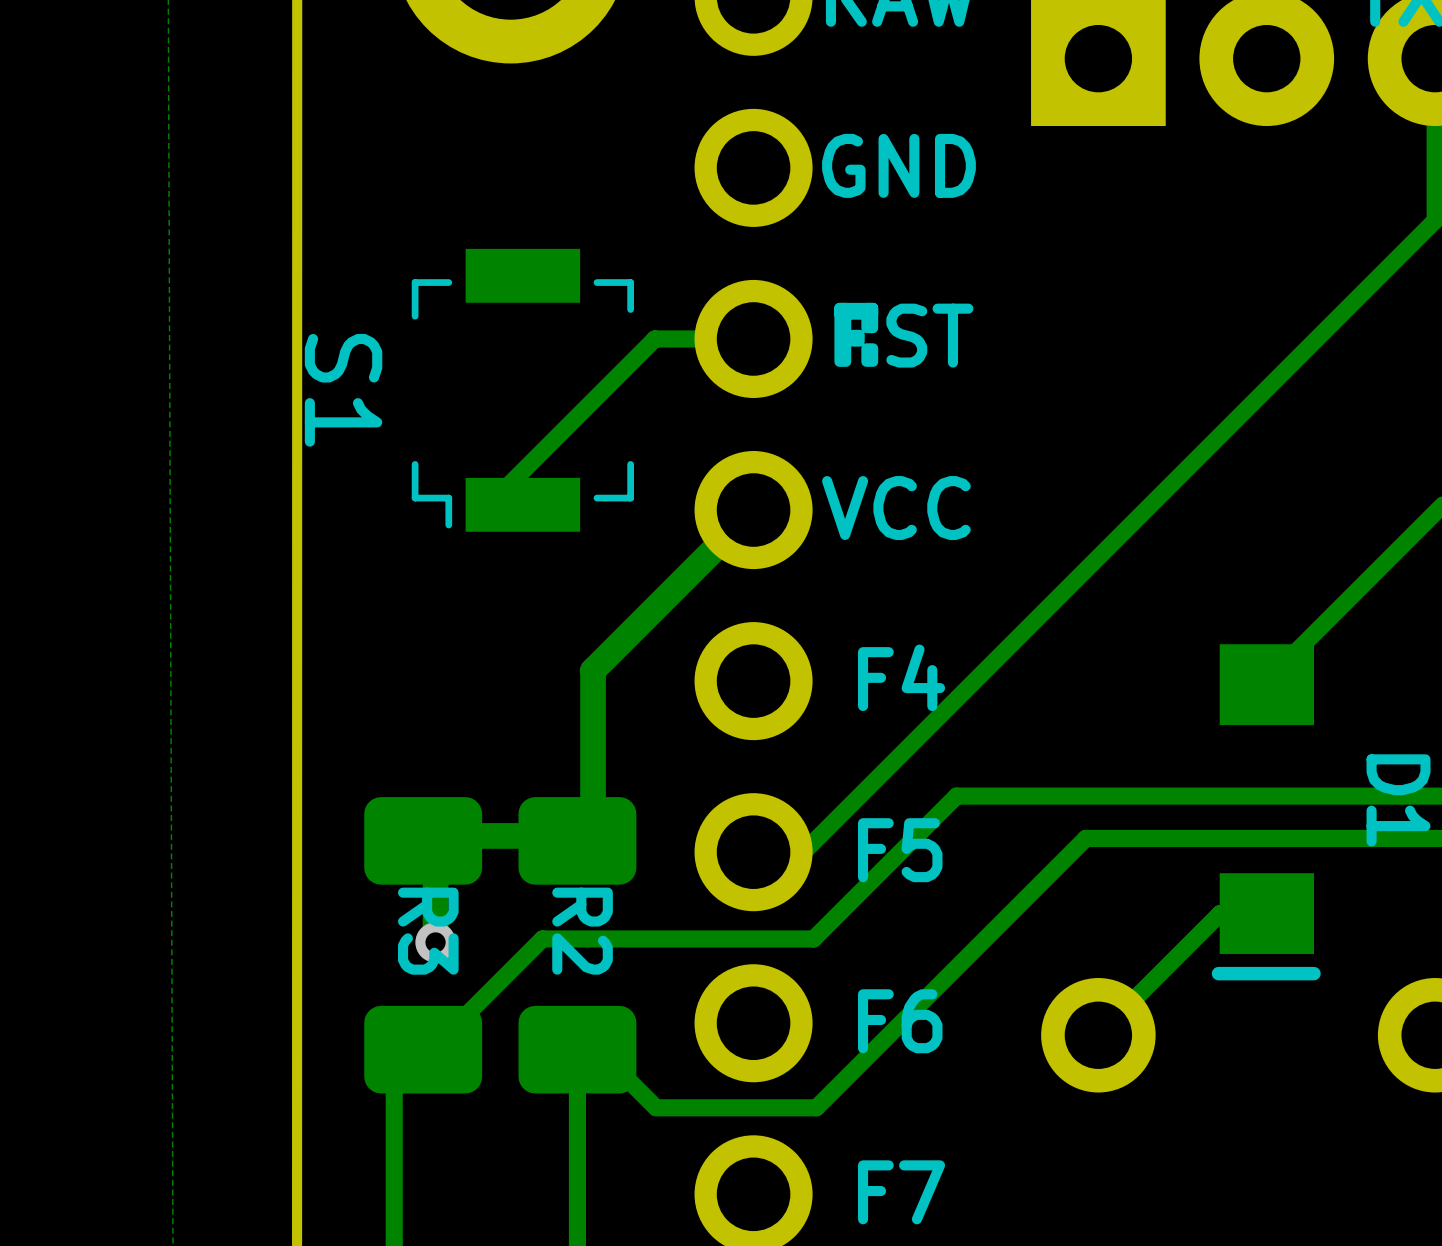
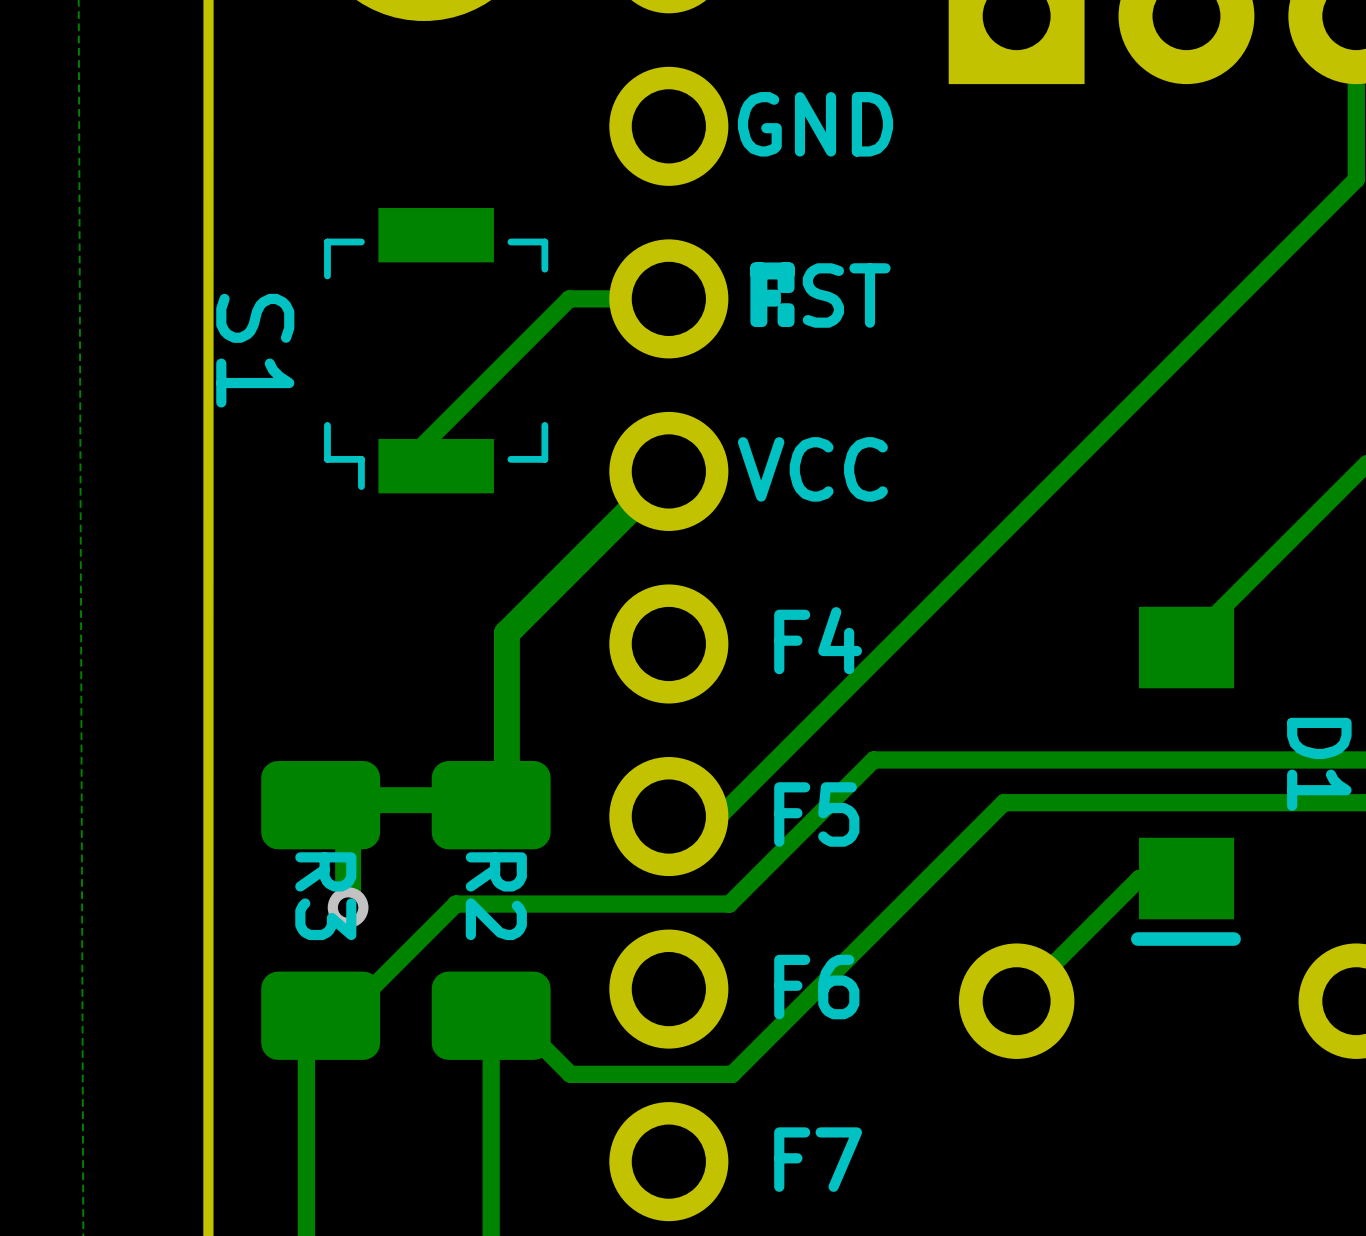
R3 position: (423, 945) -> (320, 910)

